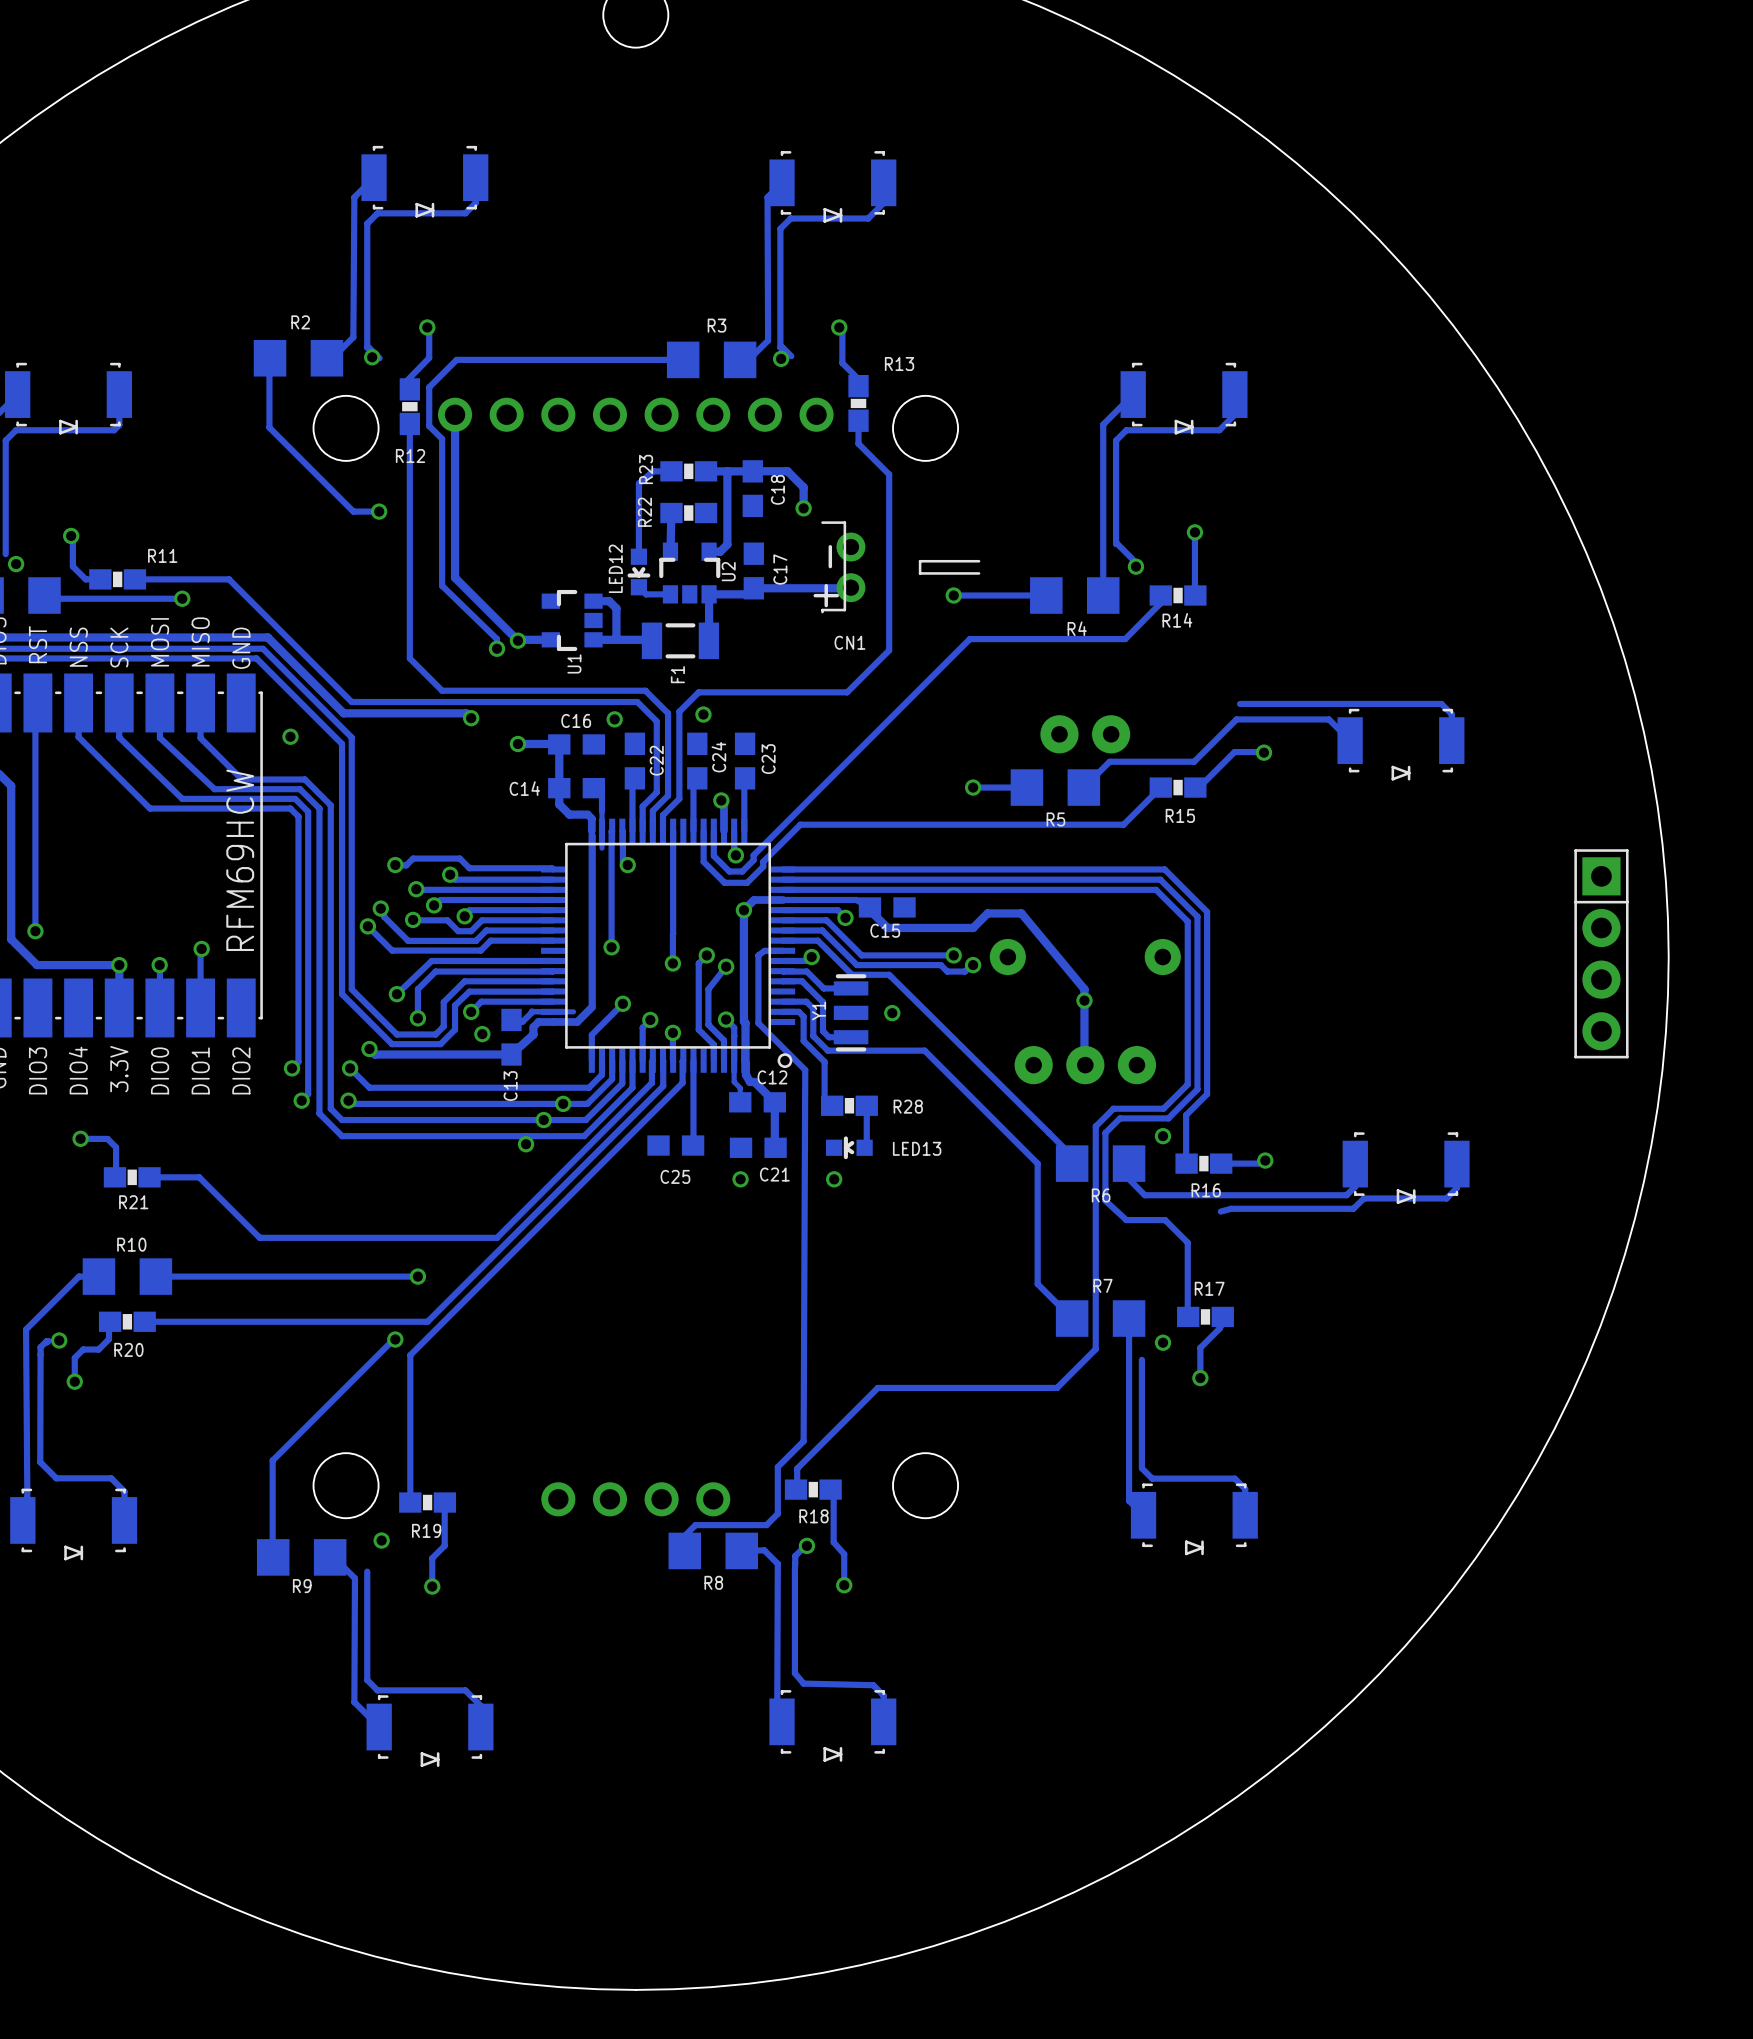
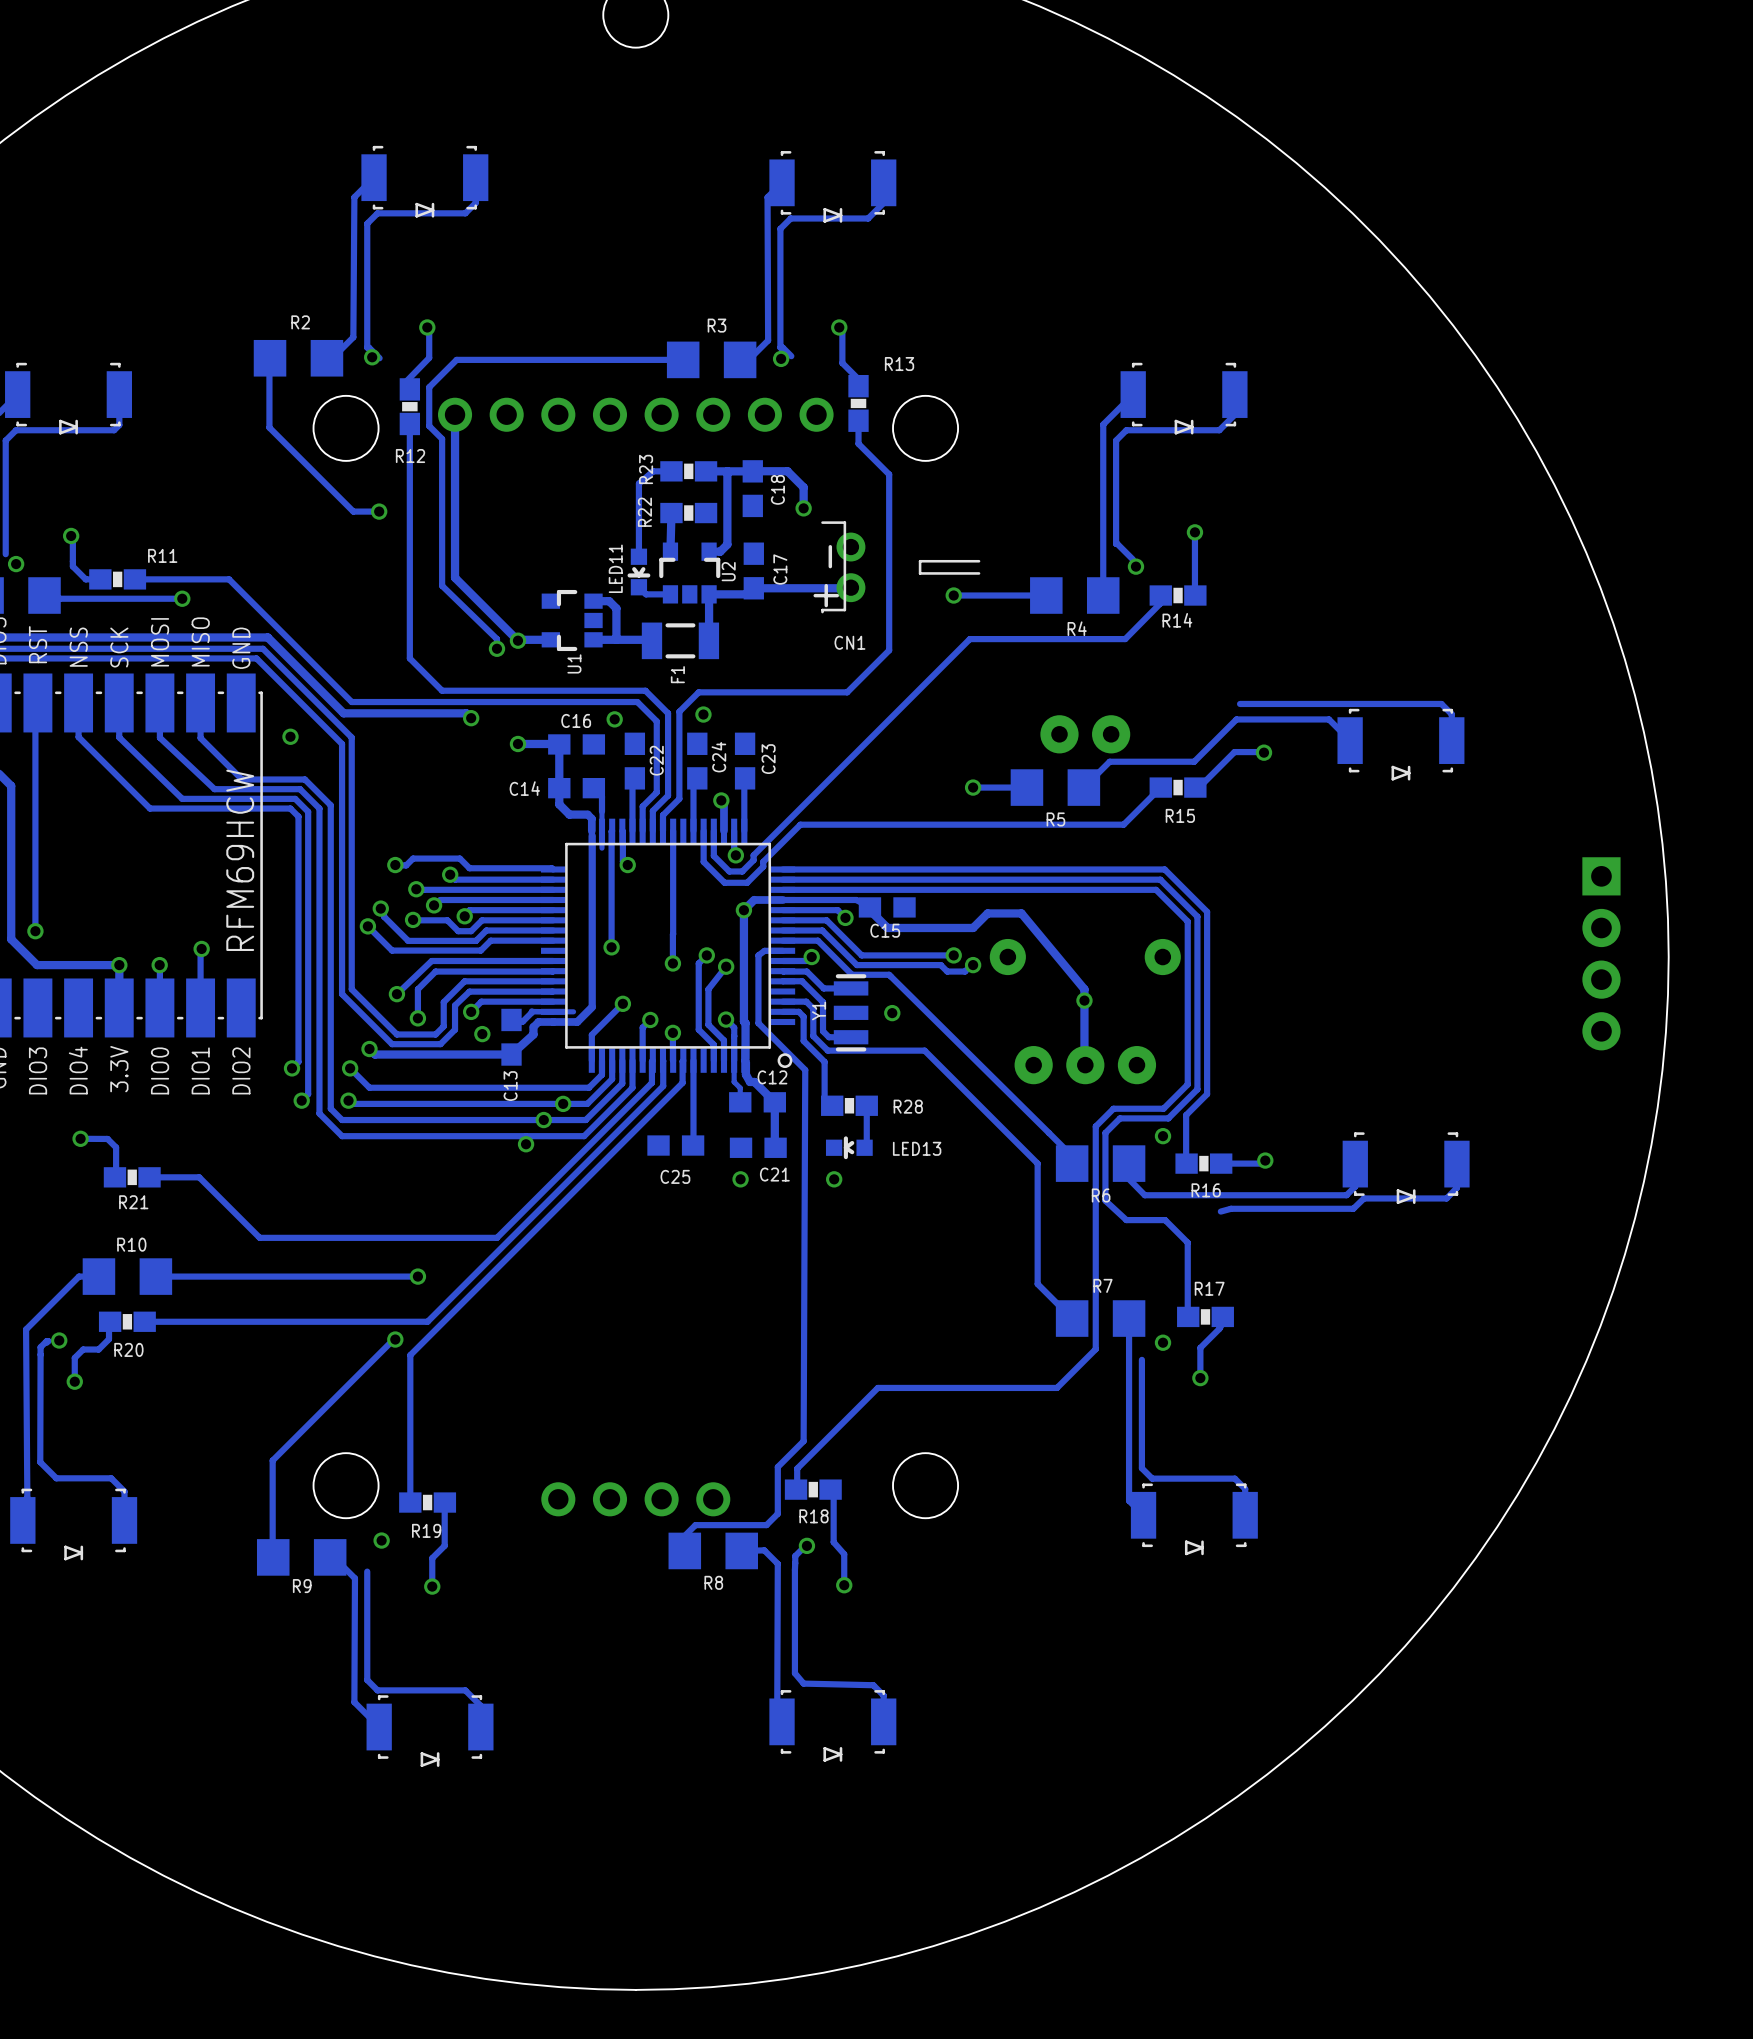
LED12 name: LED12 (615, 568) -> LED11 (615, 568)
part side: bottom (1601, 953) -> top (1601, 953)

